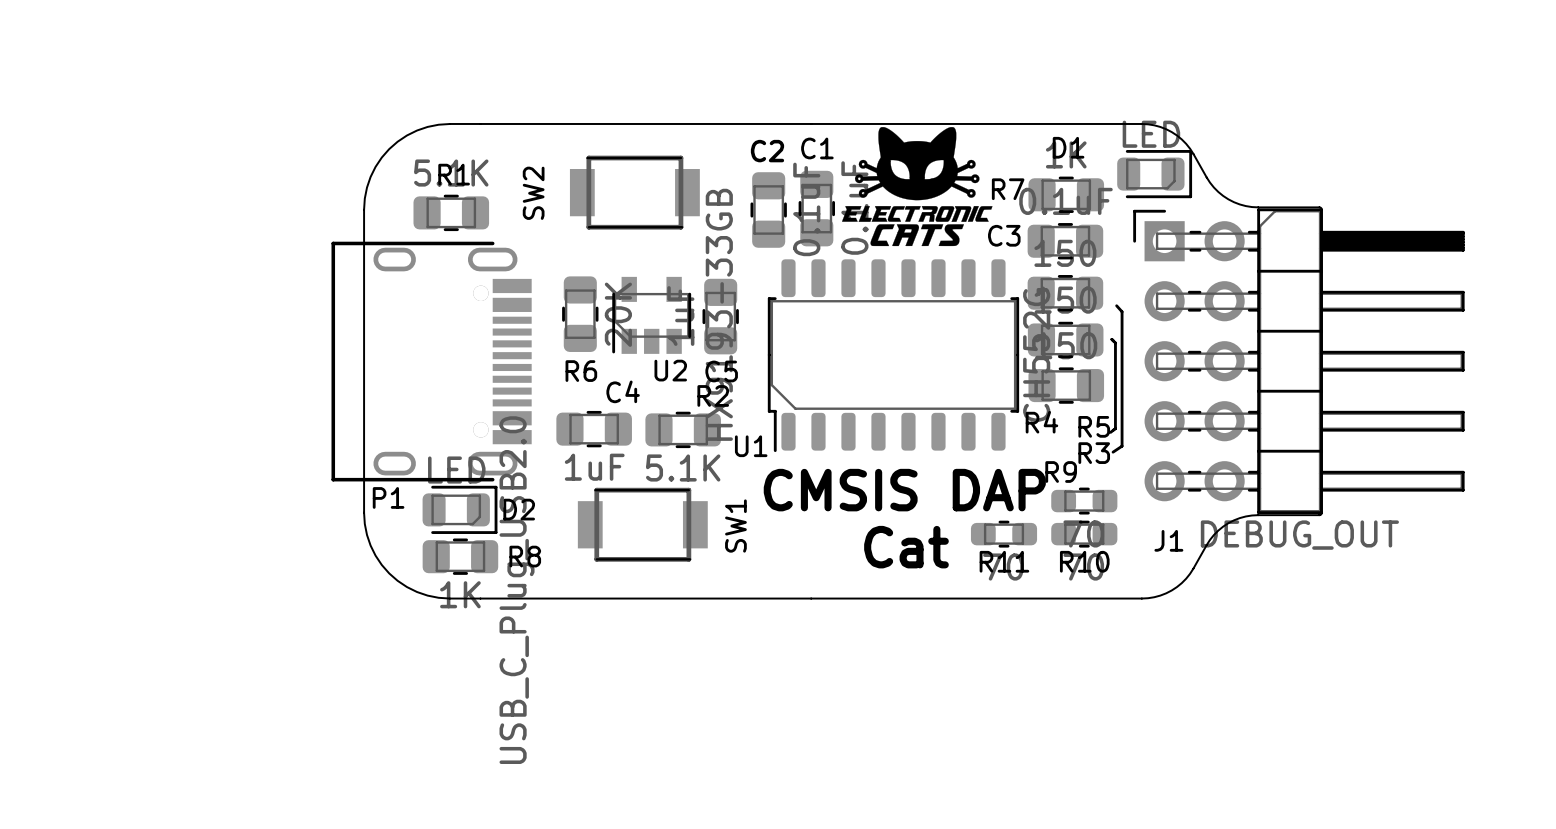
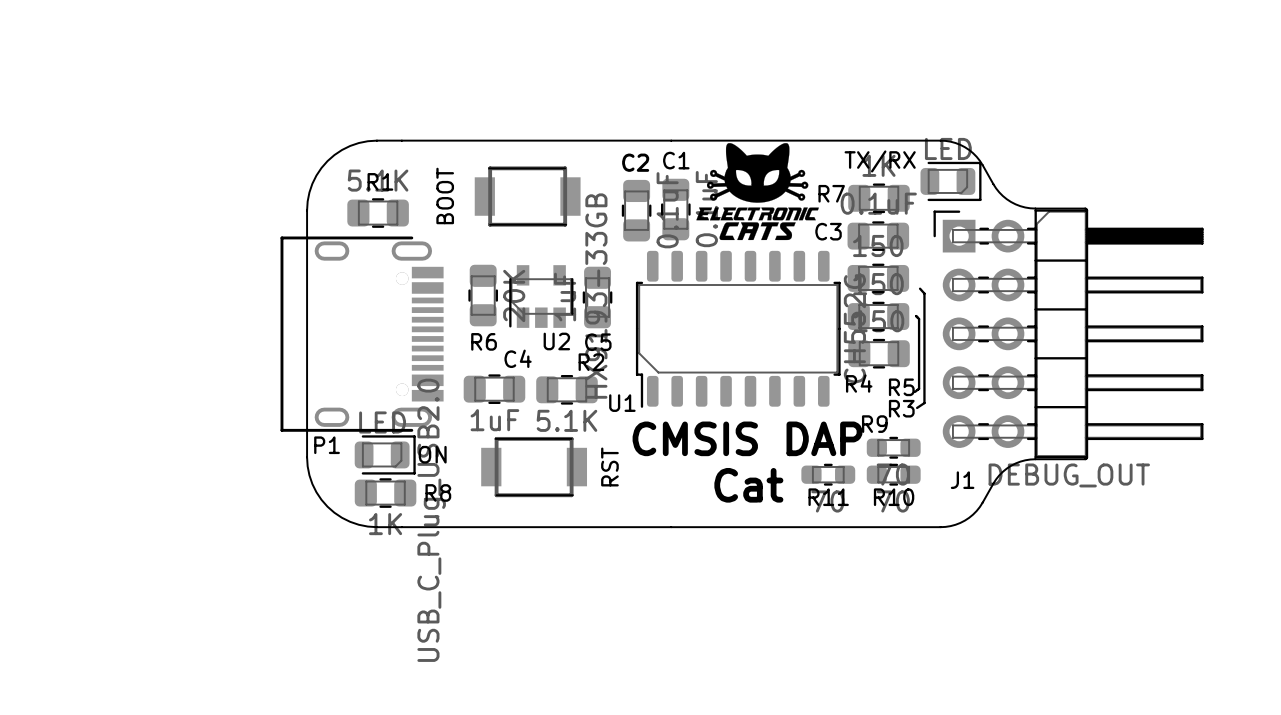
D1 name: D1 (1068, 147) -> TX/RX (880, 161)
SW2 name: SW2 (533, 193) -> BOOT (445, 195)
D2 name: D2 (519, 509) -> ON (432, 454)
SW1 name: SW1 (735, 526) -> RST (609, 466)

